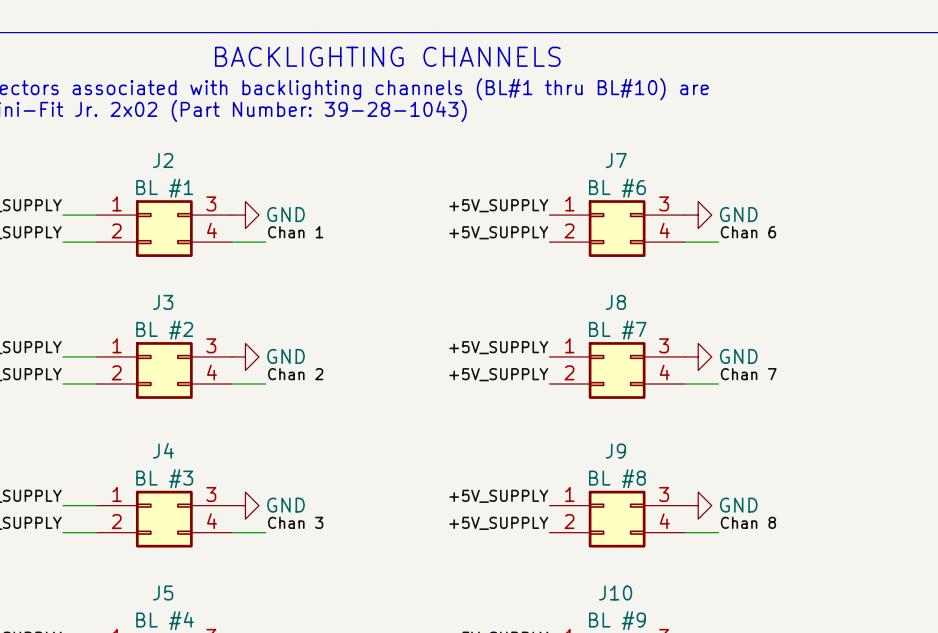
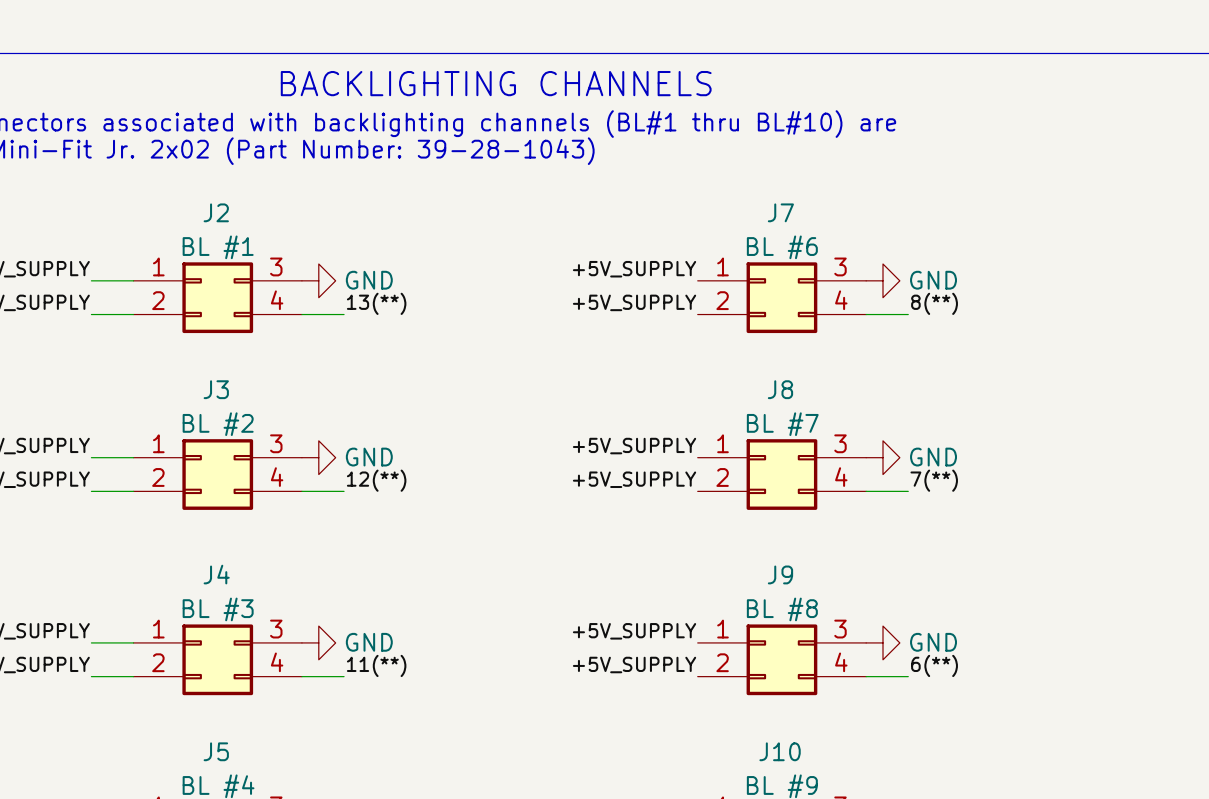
label: Chan 1 (295, 232) -> 13(**) (376, 303)
label: Chan 6 (748, 232) -> 8(**) (934, 303)
label: Chan 2 (295, 374) -> 12(**) (376, 480)
label: Chan 7 (748, 374) -> 7(**) (934, 480)
label: Chan 3 (295, 522) -> 11(**) (376, 665)
label: Chan 8 (748, 522) -> 6(**) (934, 665)

